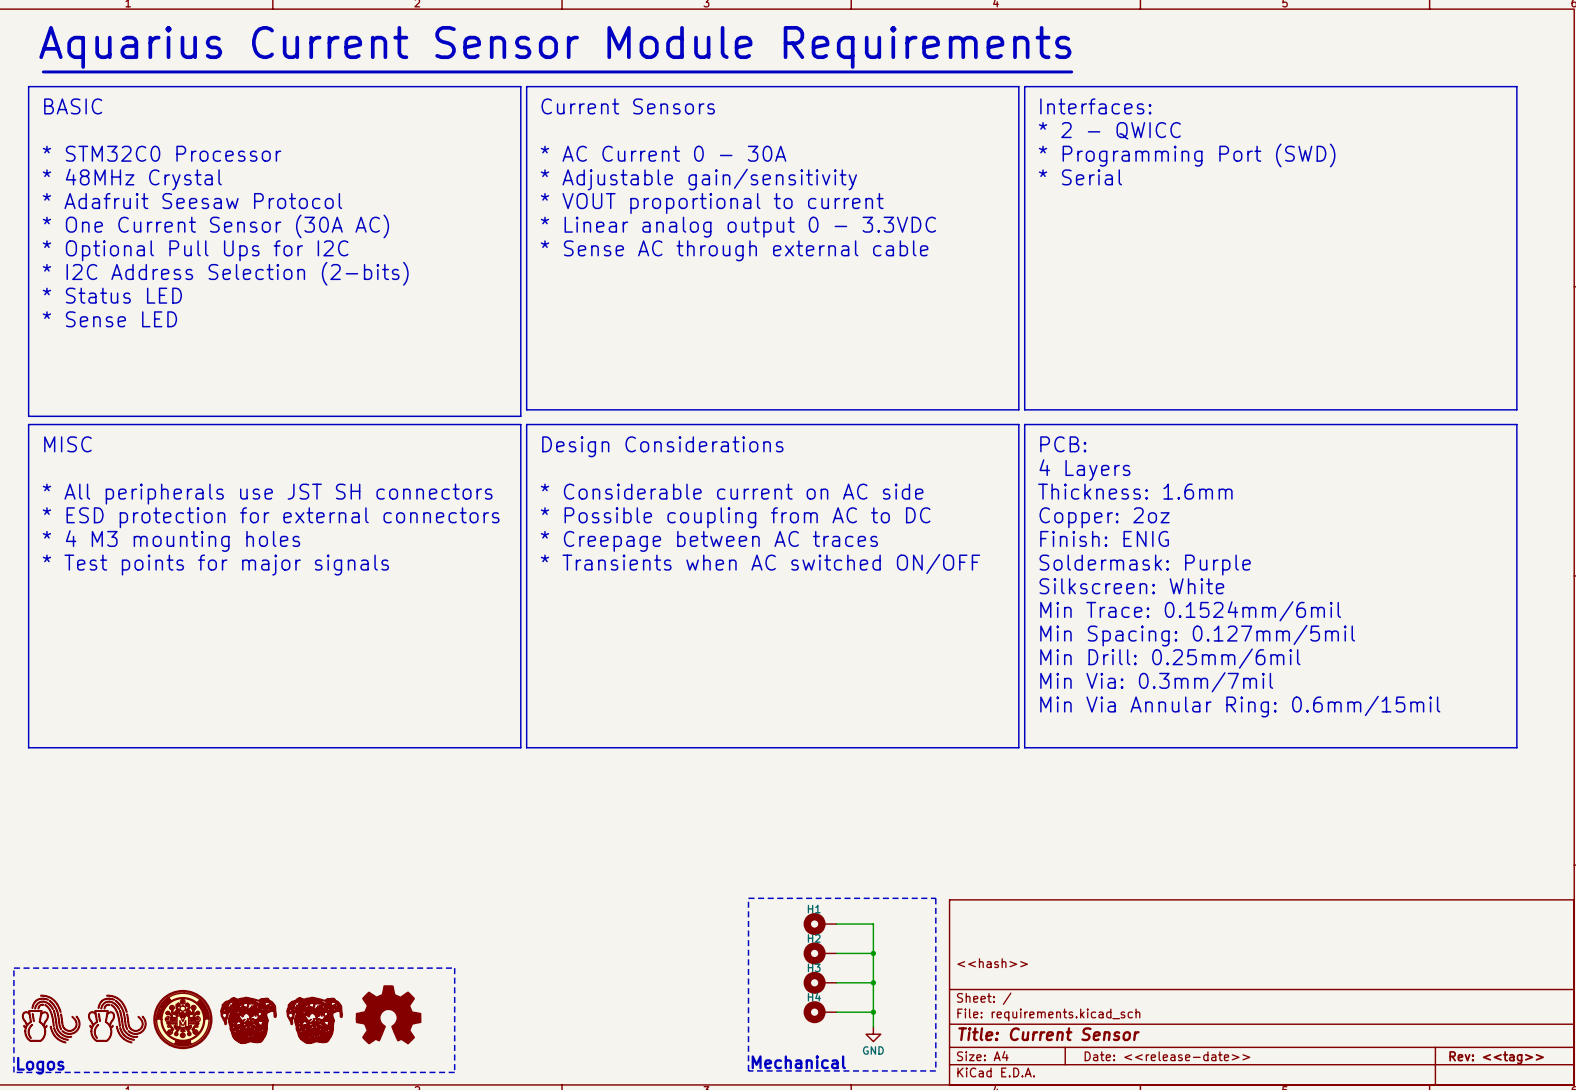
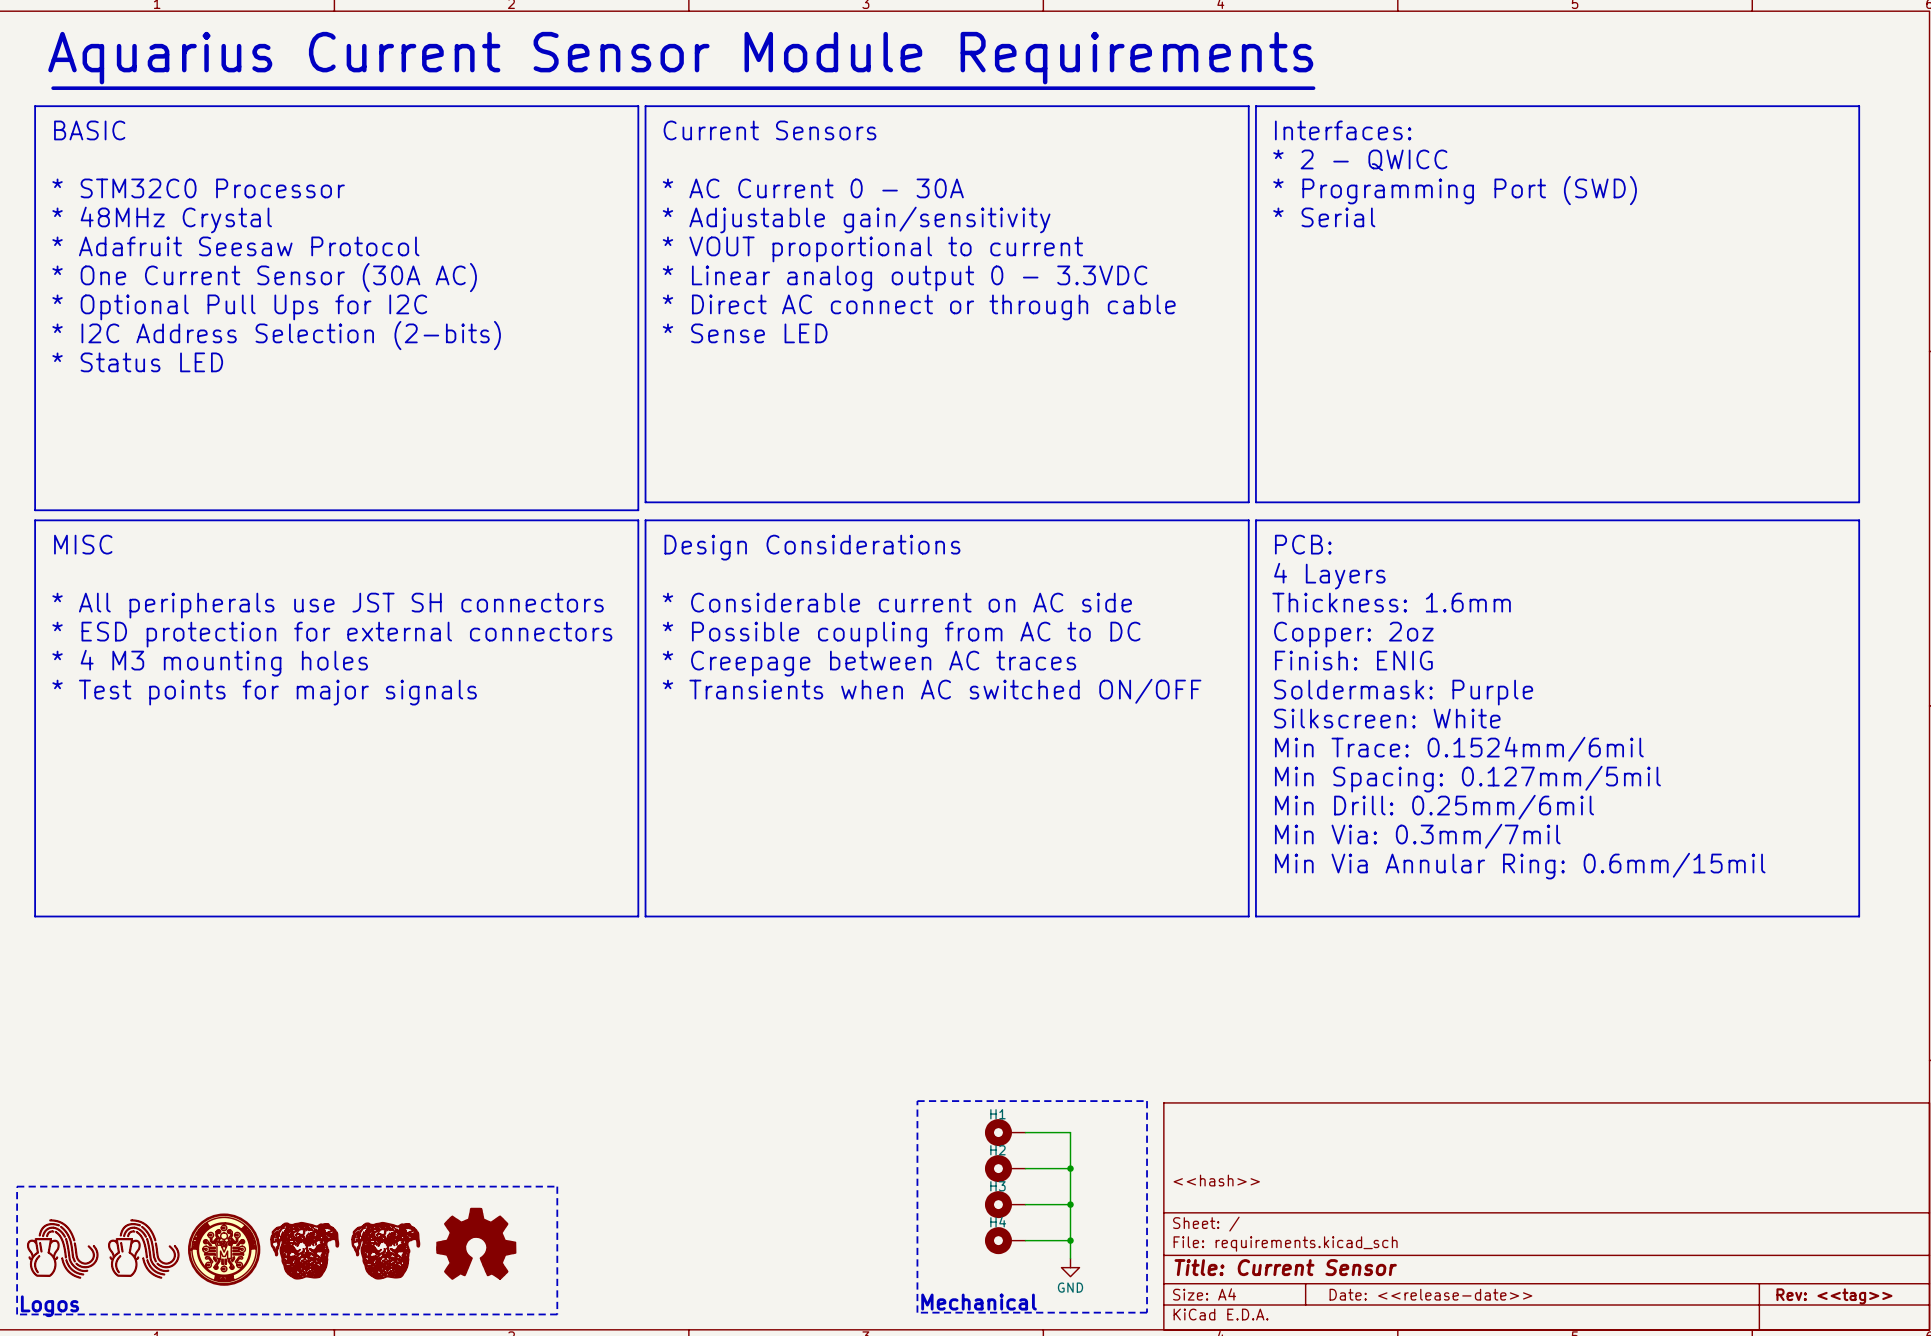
text: * Sense AC through external cable (734, 250) -> * Direct AC connect or through cable (919, 307)
text: none -> * Sense LED (745, 333)
text: * Sense LED (109, 319) -> none

